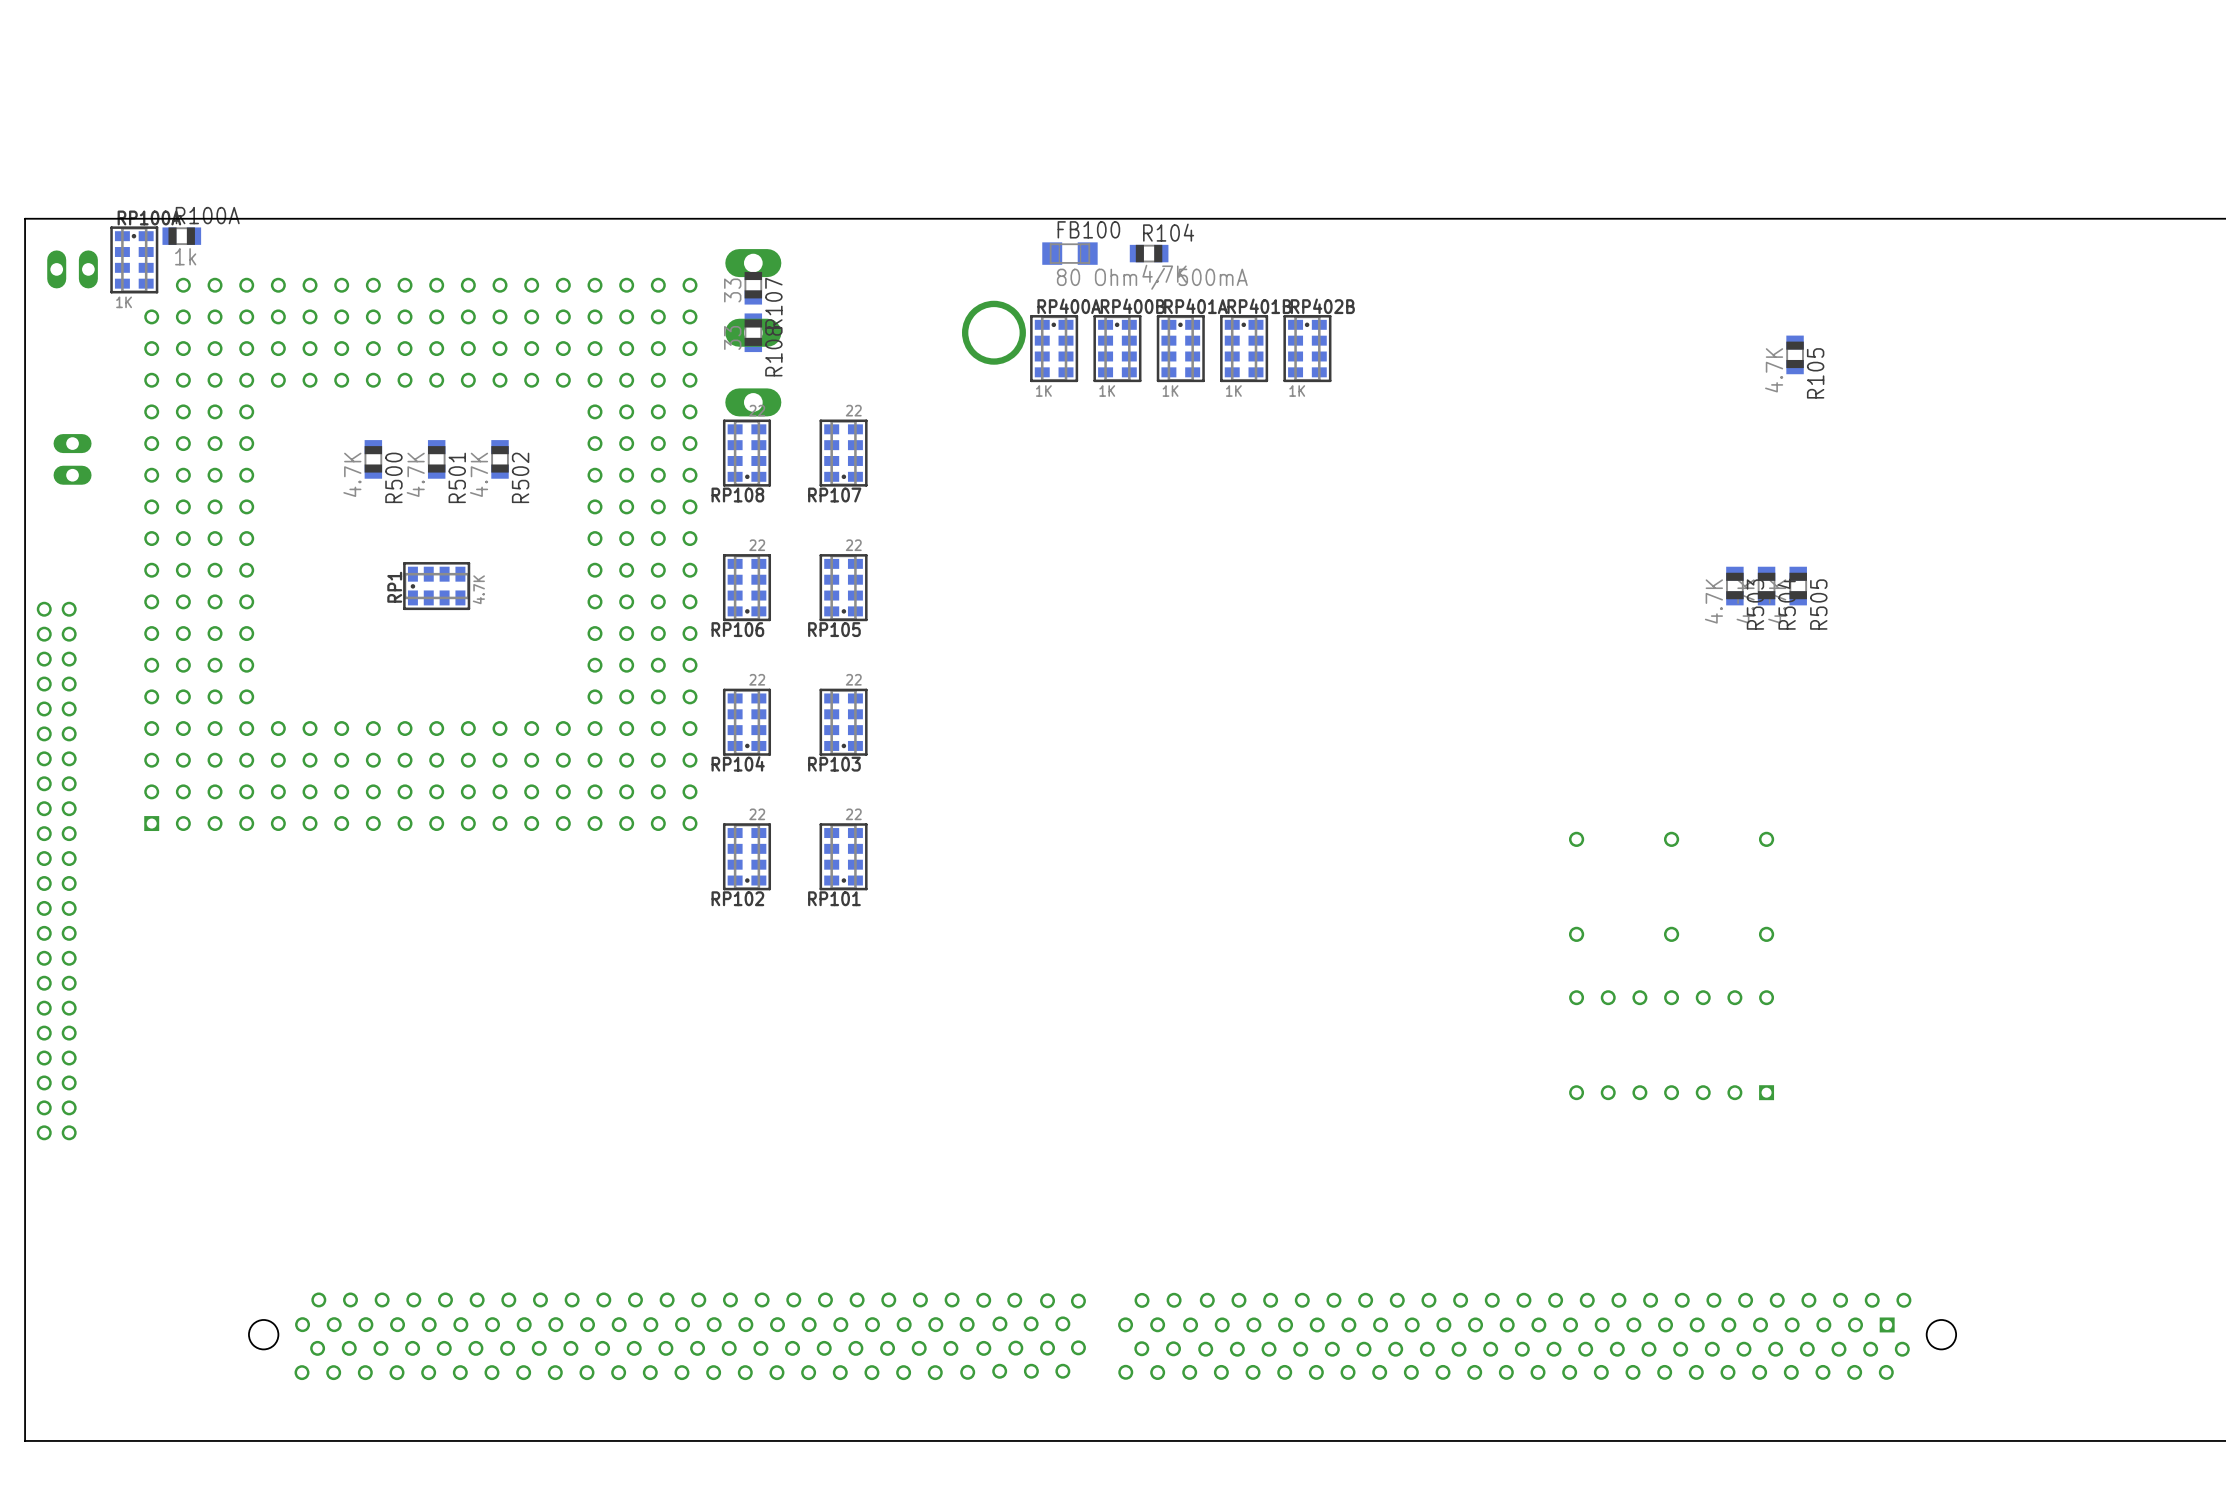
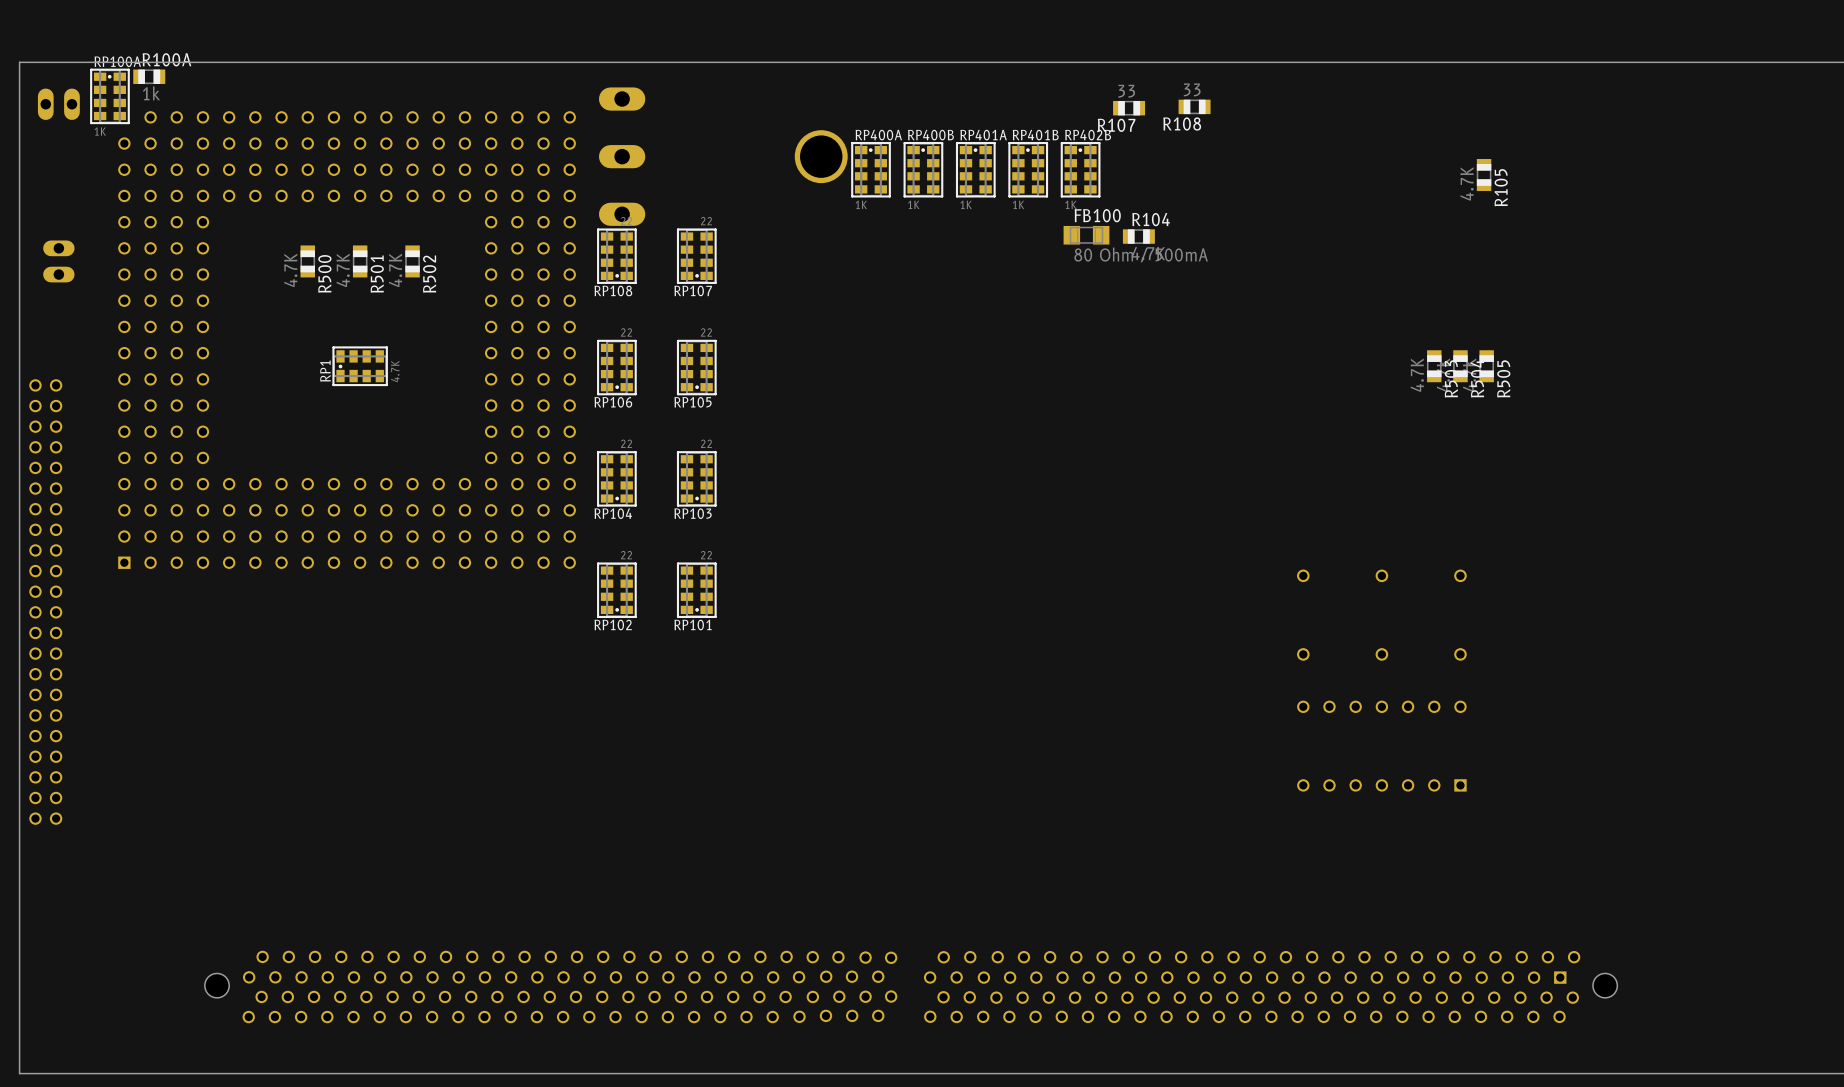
FB100 position: (1069, 253) -> (1086, 235)
R104 position: (1149, 253) -> (1138, 236)
R107 rotation: 0° (753, 285) -> 90° clockwise (1129, 108)
R107 position: (753, 285) -> (1129, 108)
R108 rotation: 0° (753, 332) -> 90° clockwise (1194, 106)
R108 position: (753, 332) -> (1194, 106)

